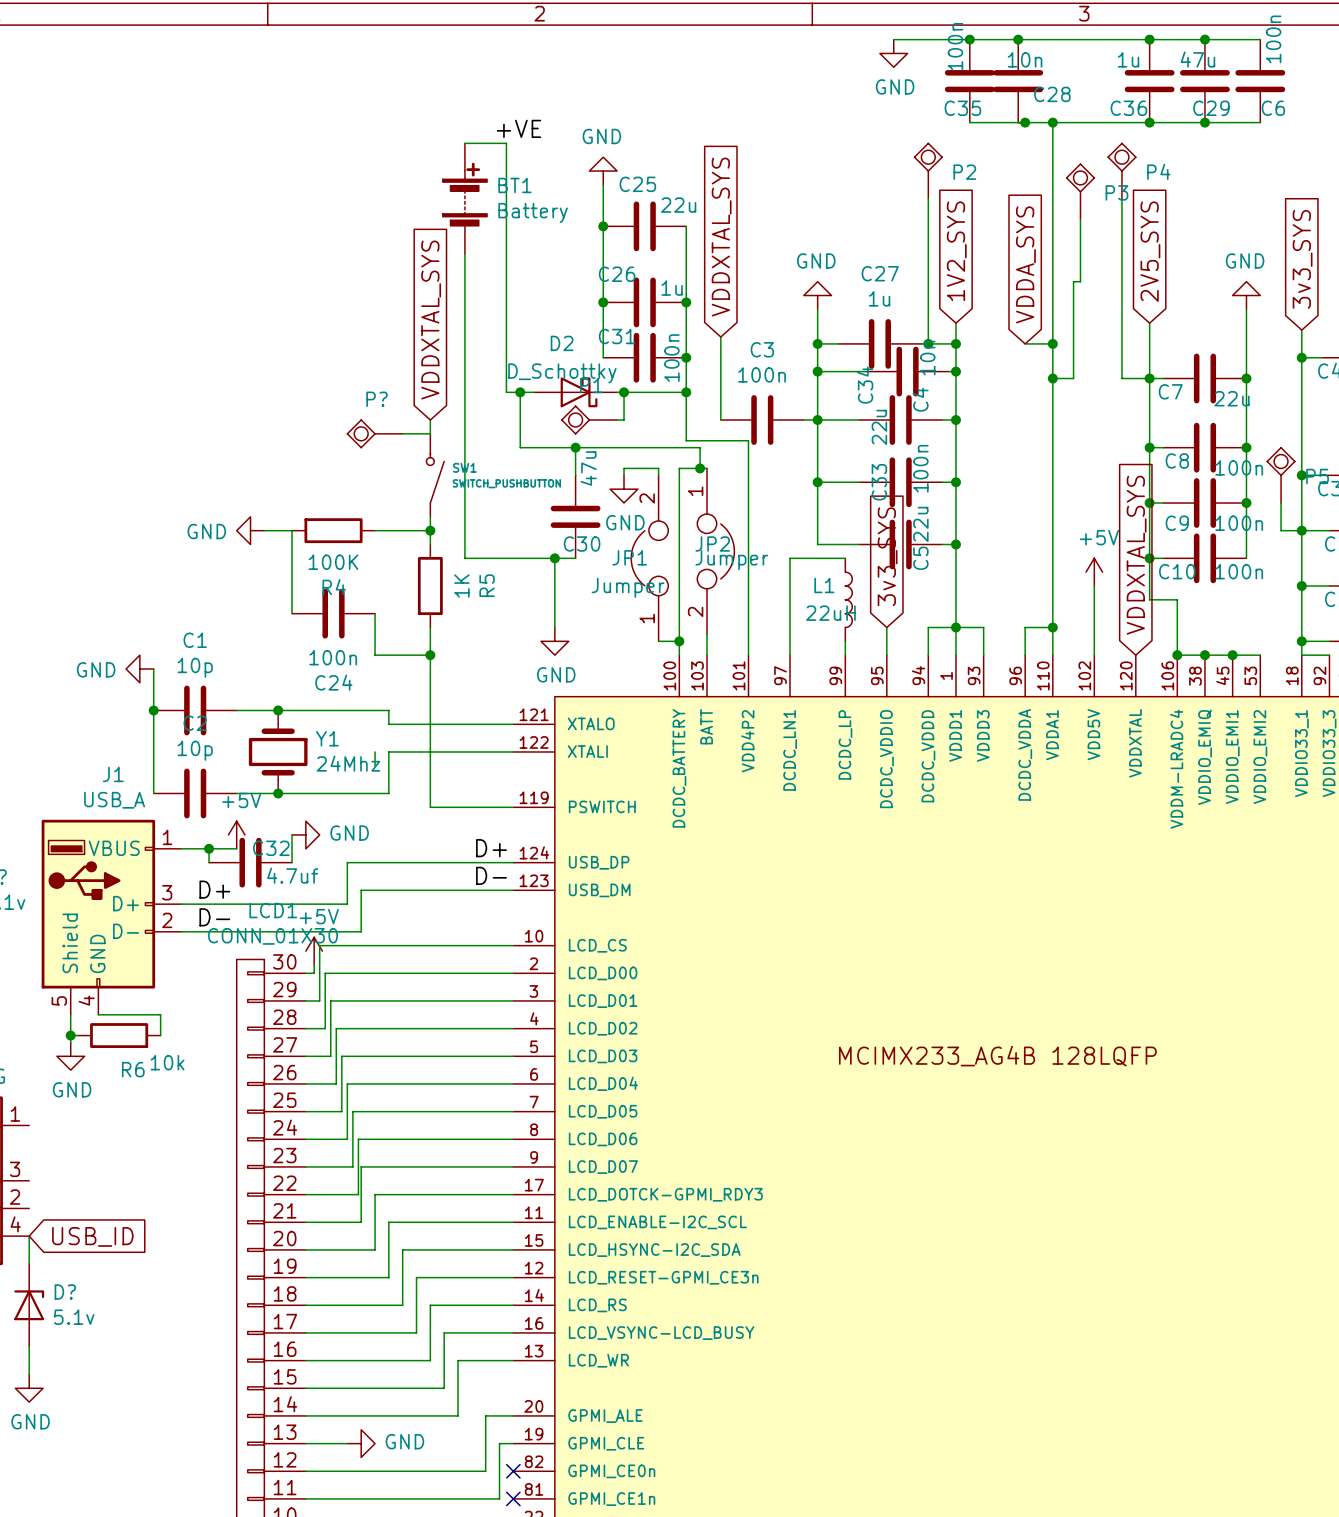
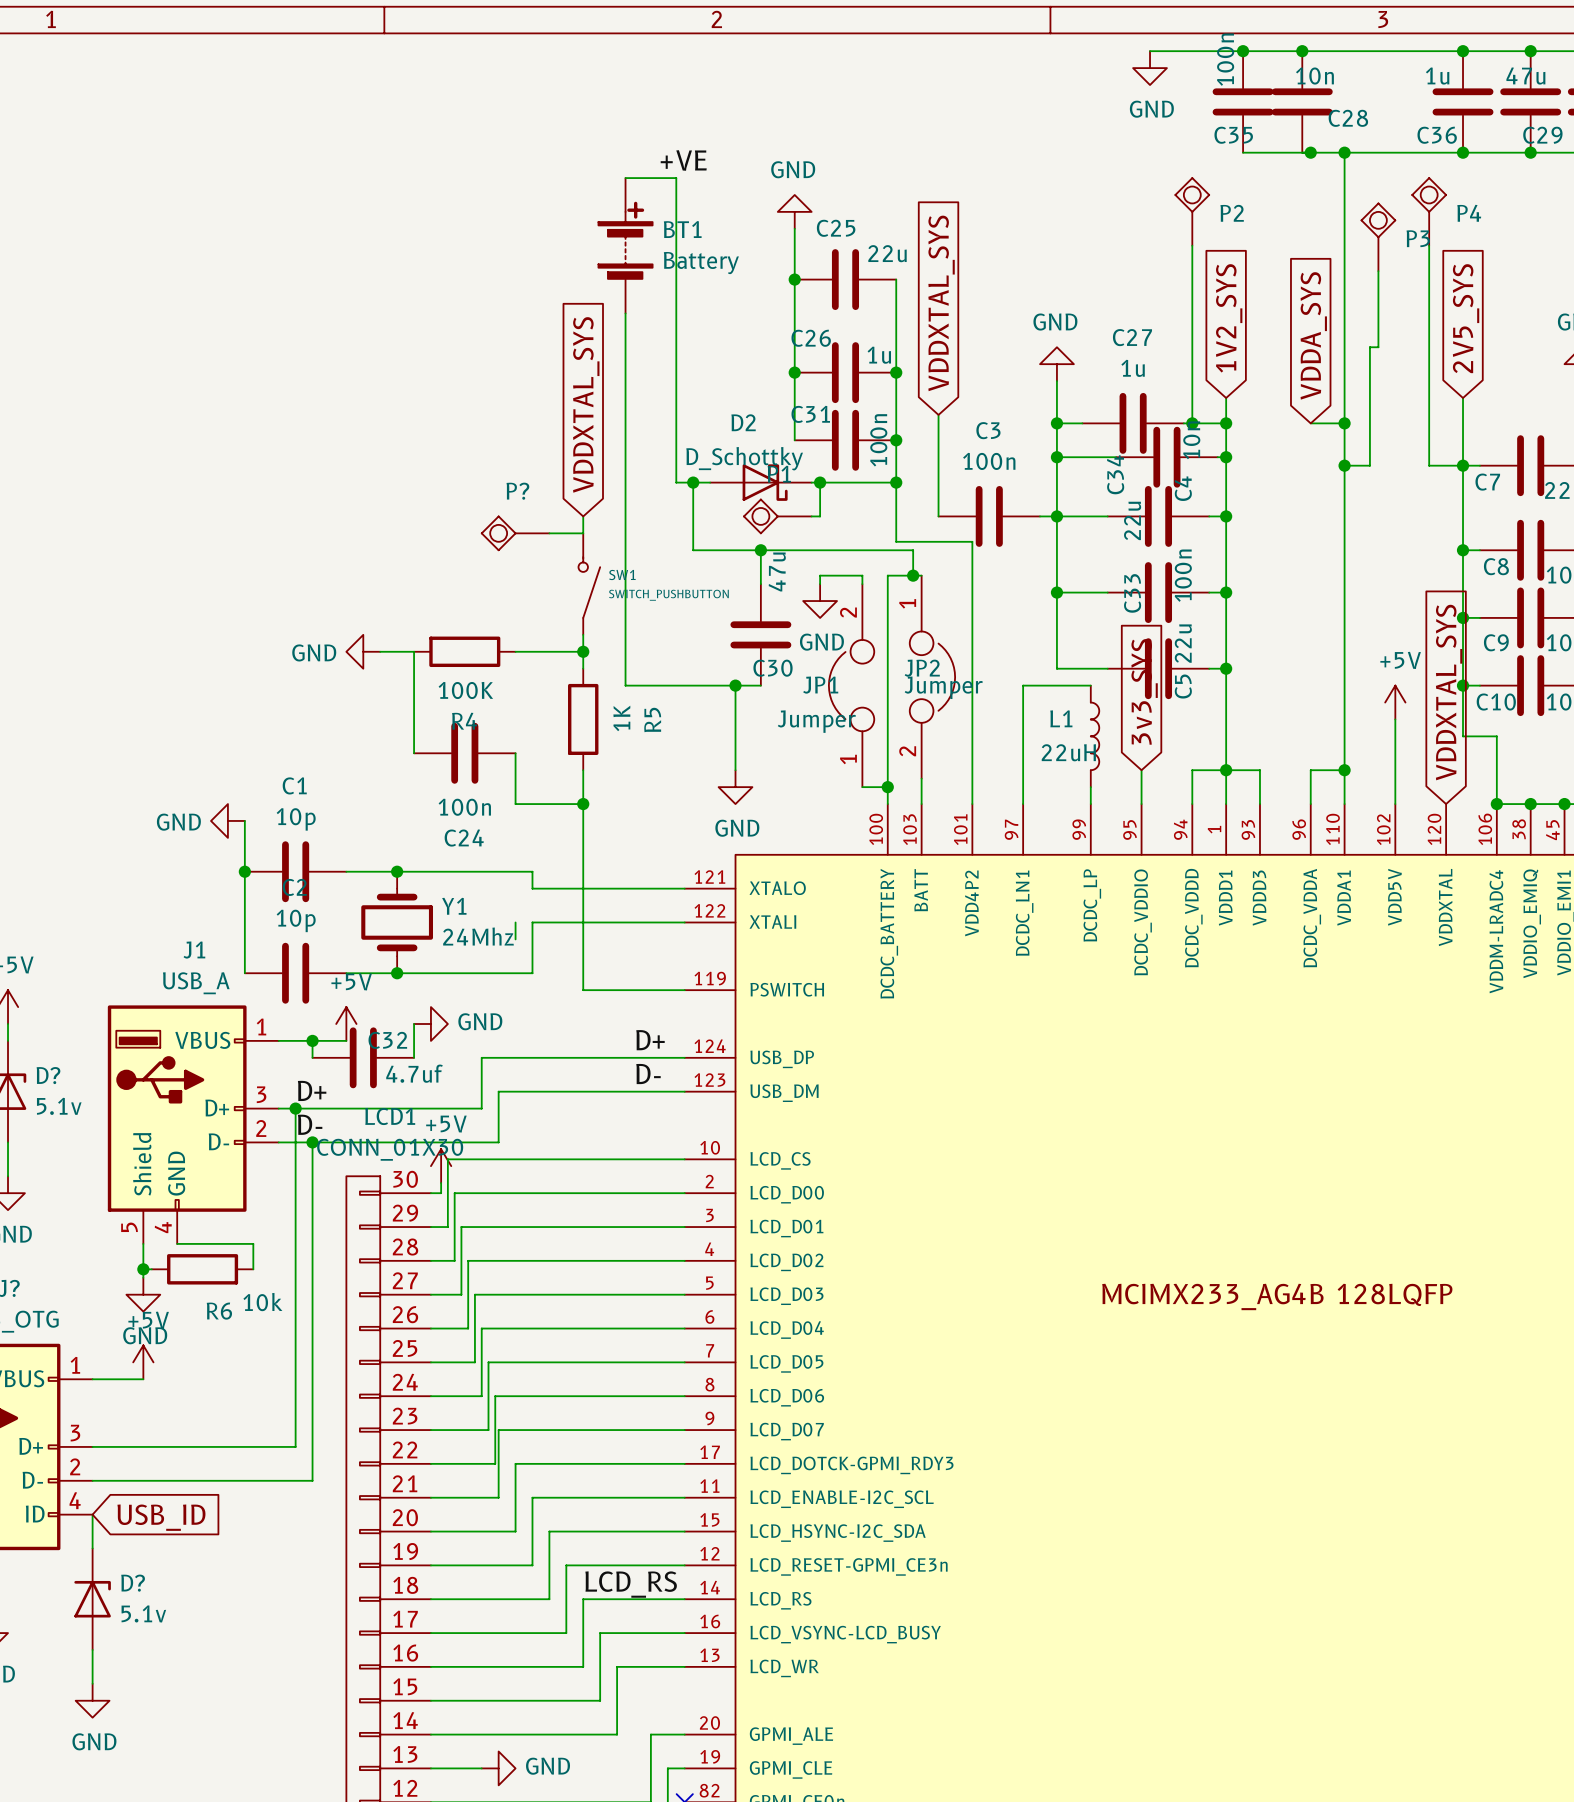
wire: none -> (295, 1108) (295, 1446) (92, 1446)
junction: none -> (295, 1108)
wire: none -> (312, 1142) (312, 1480) (92, 1480)
junction: none -> (312, 1142)
power symbol: none -> +5V (143, 1362)
wire: none -> (92, 1379) (143, 1379)
label: none -> LCD_RS (631, 1584)

